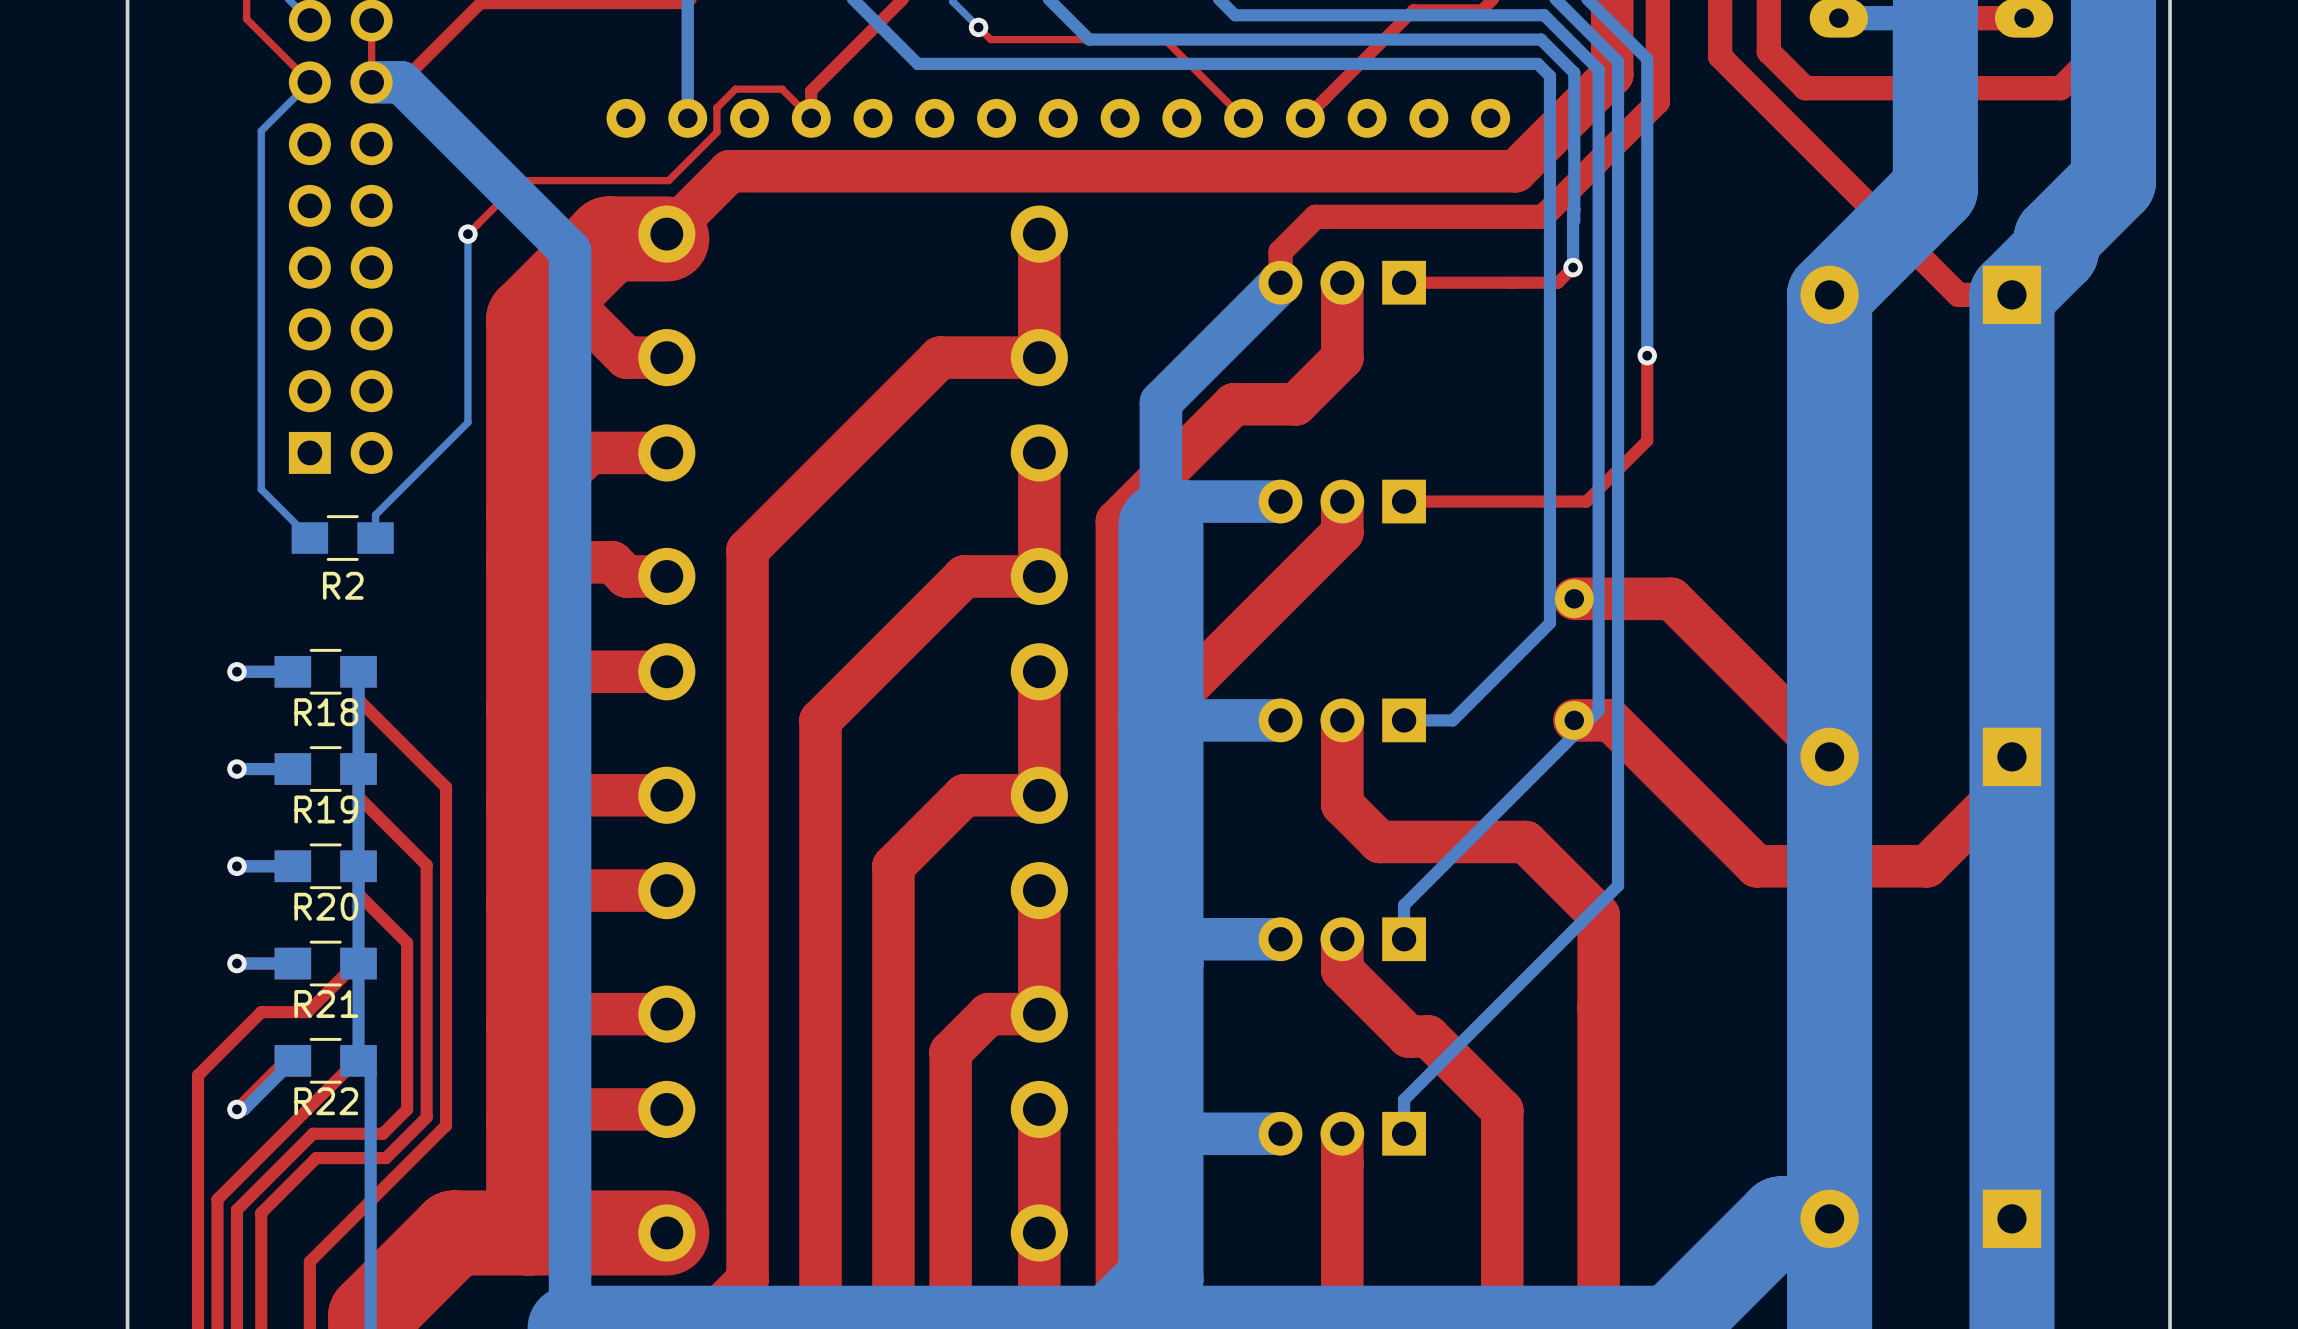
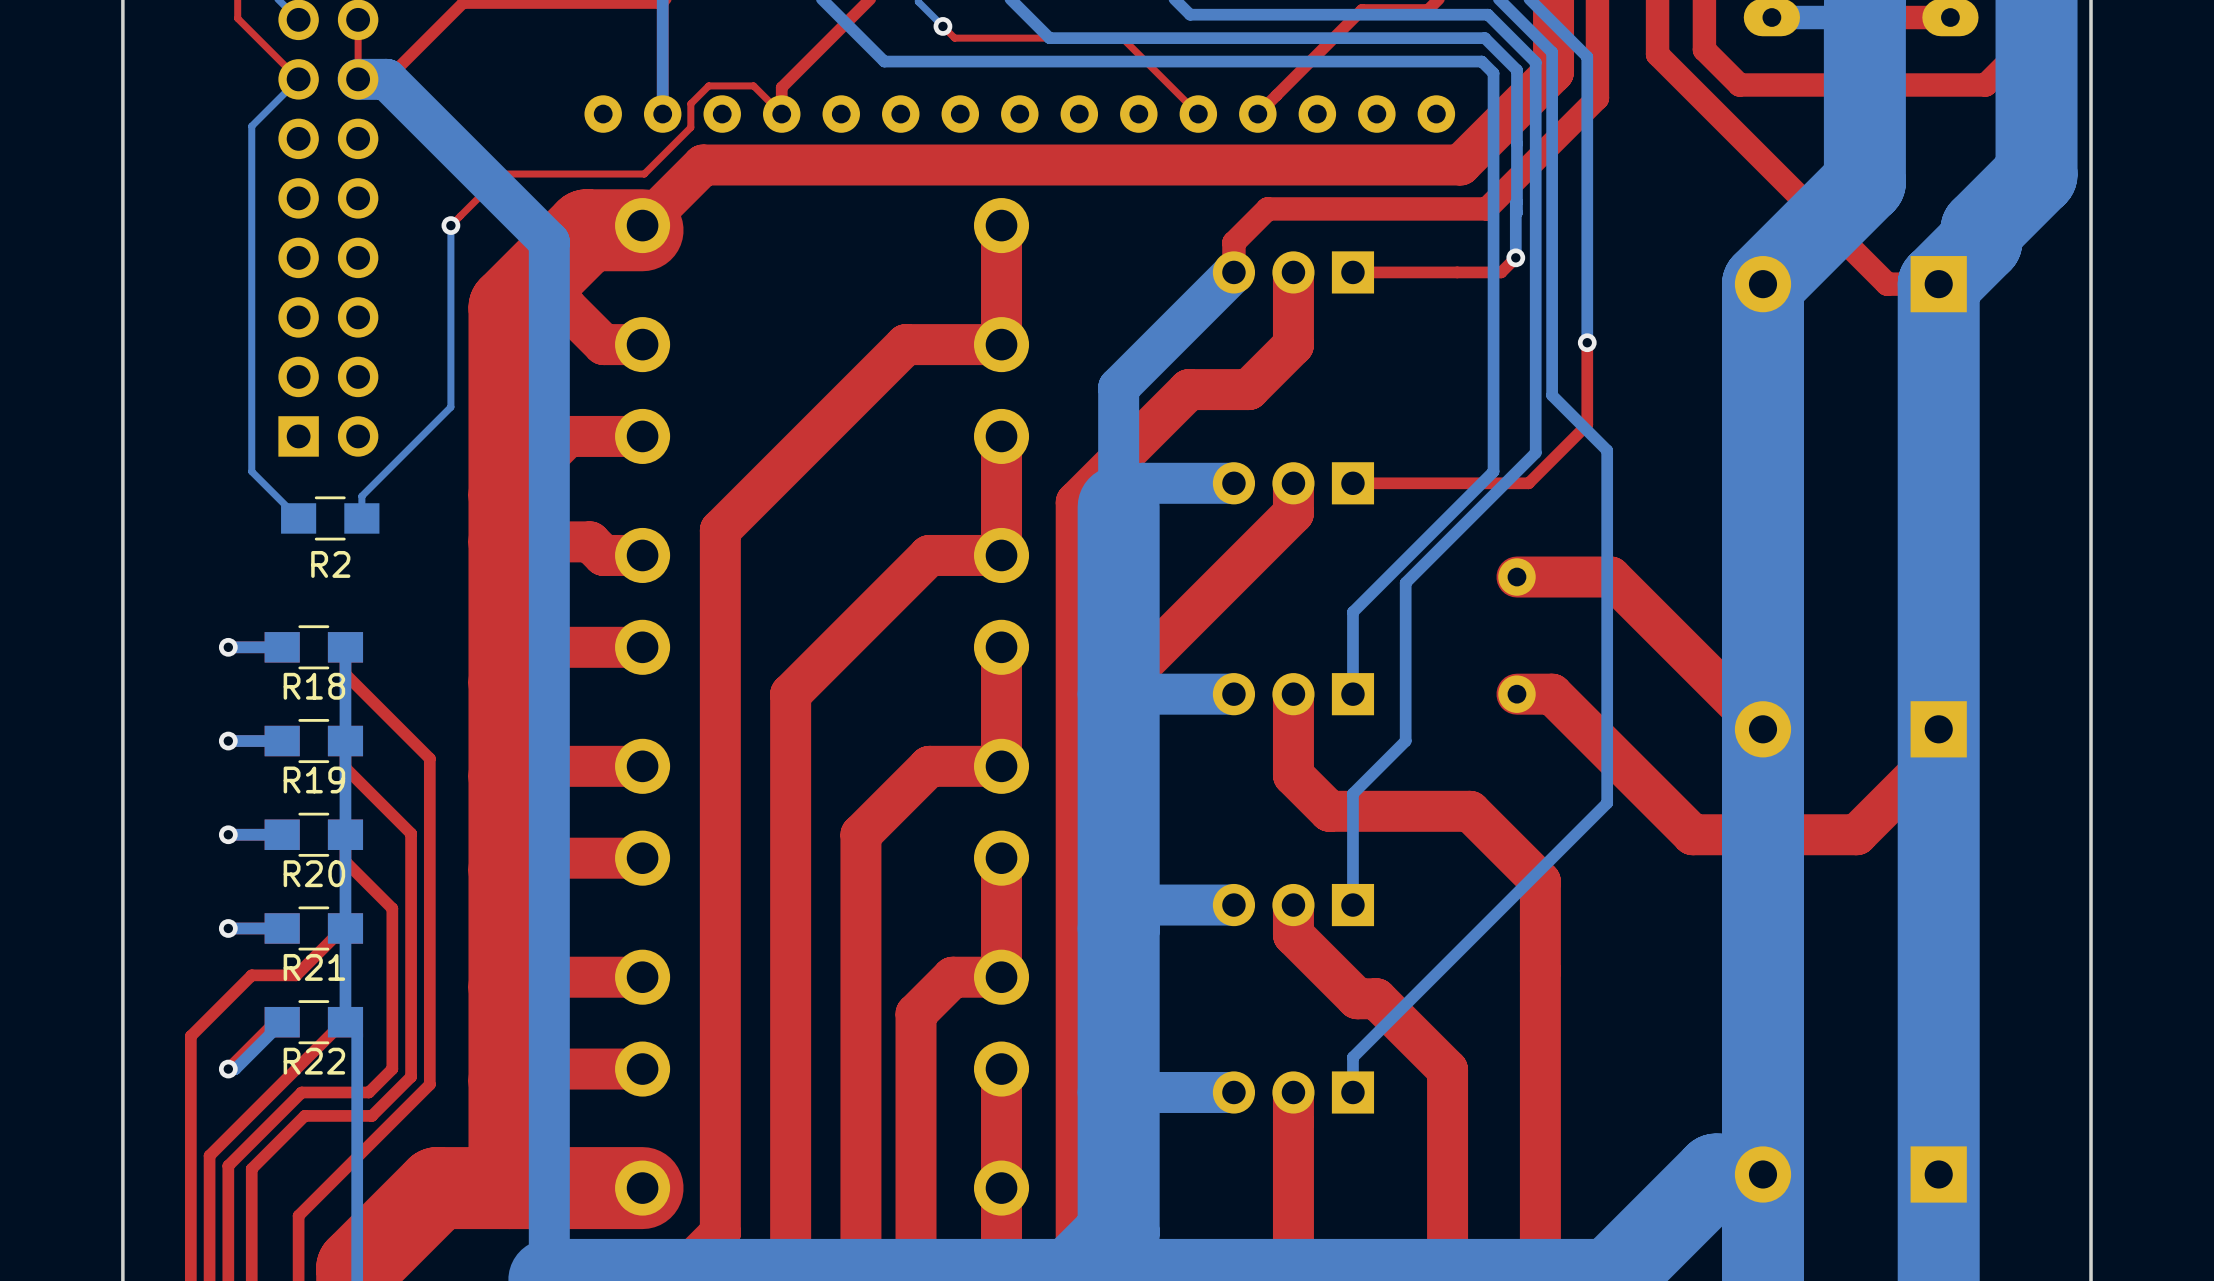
bottom track: (1610, 54) (1618, 61) (1618, 885) (1404, 1099) -> (1552, 52) (1552, 395) (1607, 450) (1607, 803) (1352, 1057) (1352, 1059)
bottom track: (1593, 64) (1598, 69) (1598, 710) (1404, 905) -> (1535, 62) (1535, 452) (1405, 582) (1405, 741) (1352, 793) (1352, 872)
bottom track: (1549, 489) (1549, 623) (1452, 720) (1404, 720) -> (1493, 471) (1352, 612) (1352, 694)

